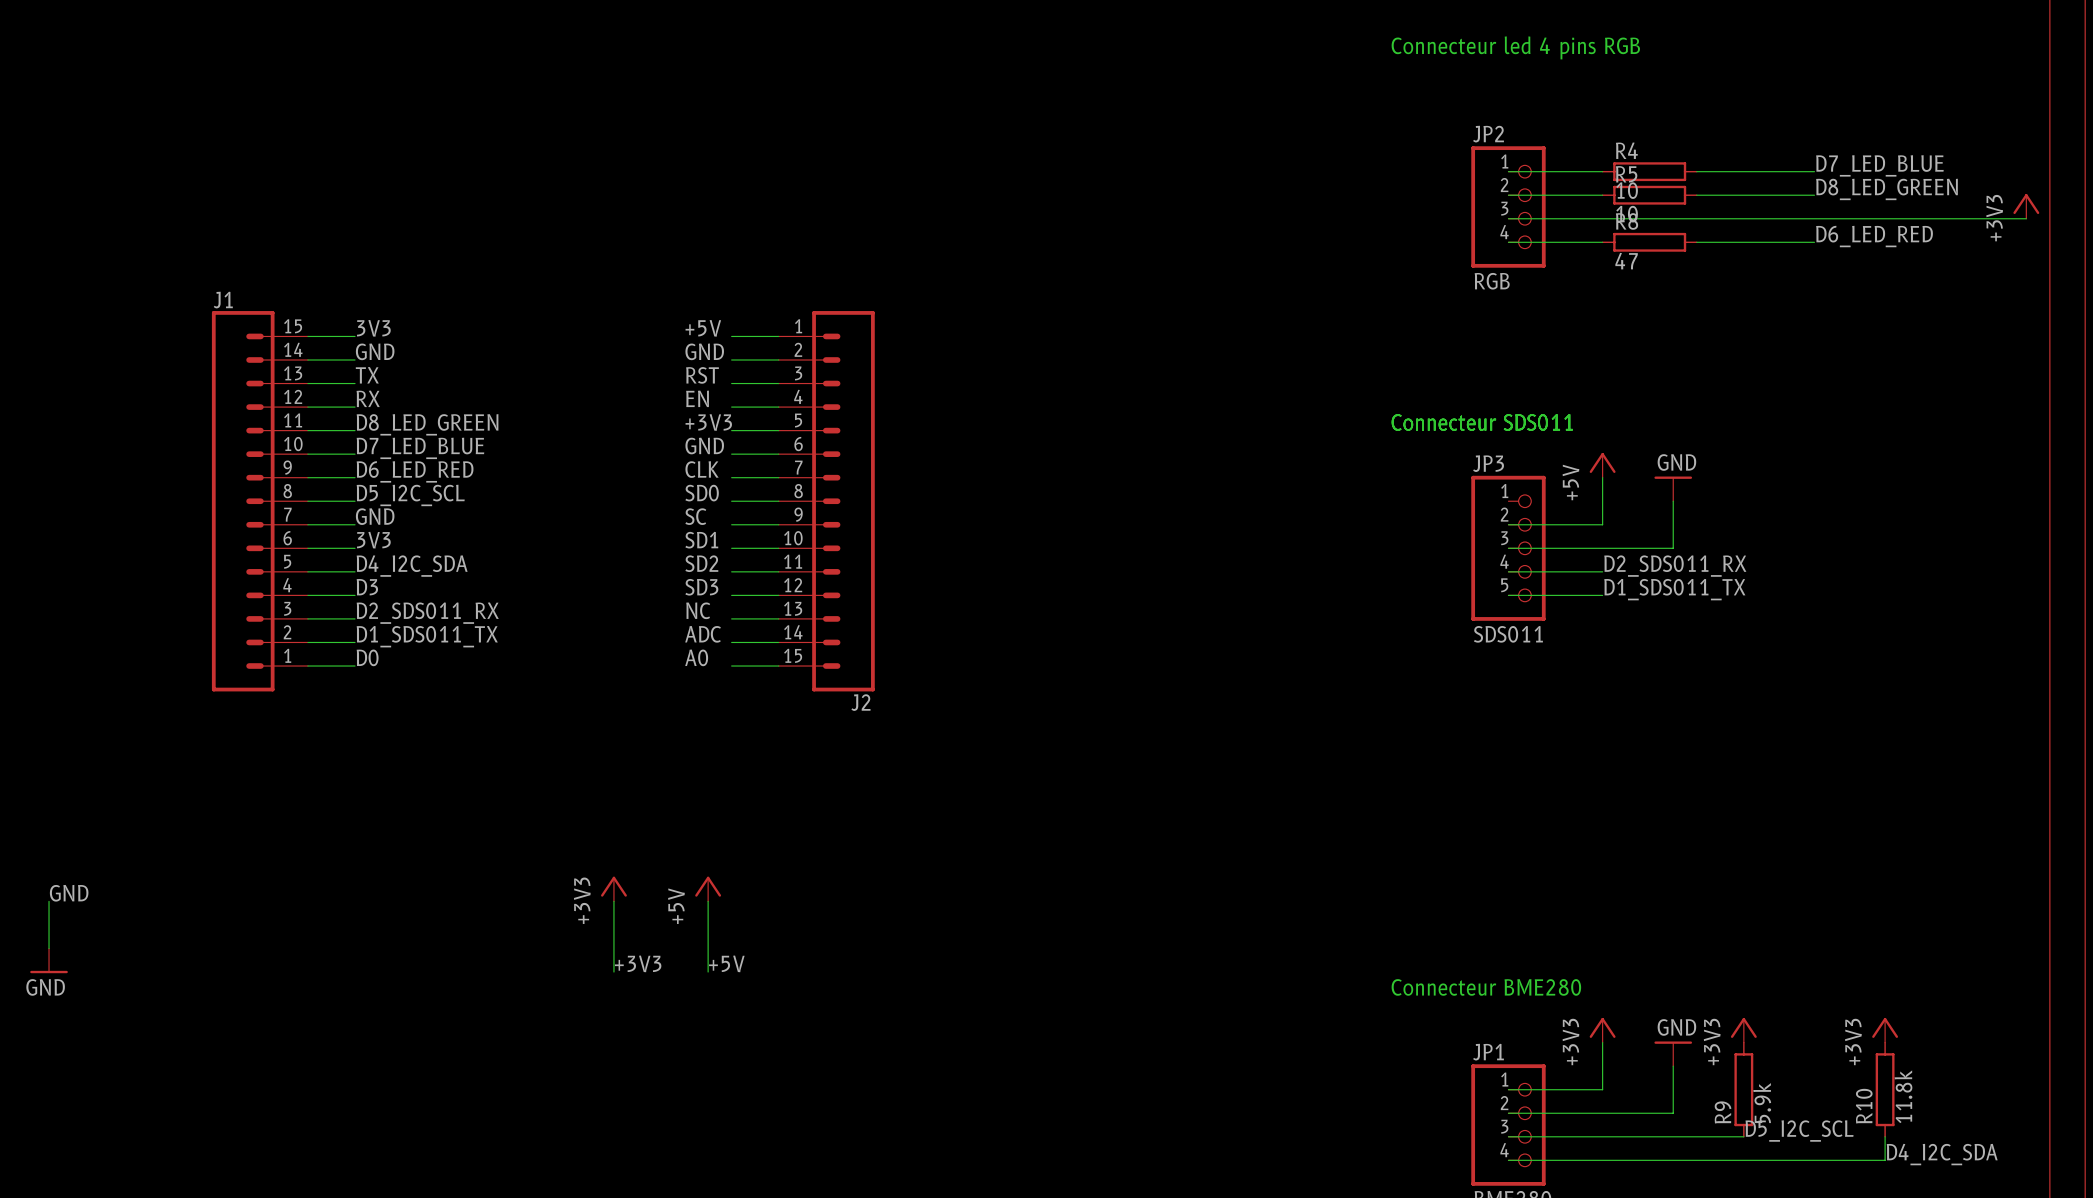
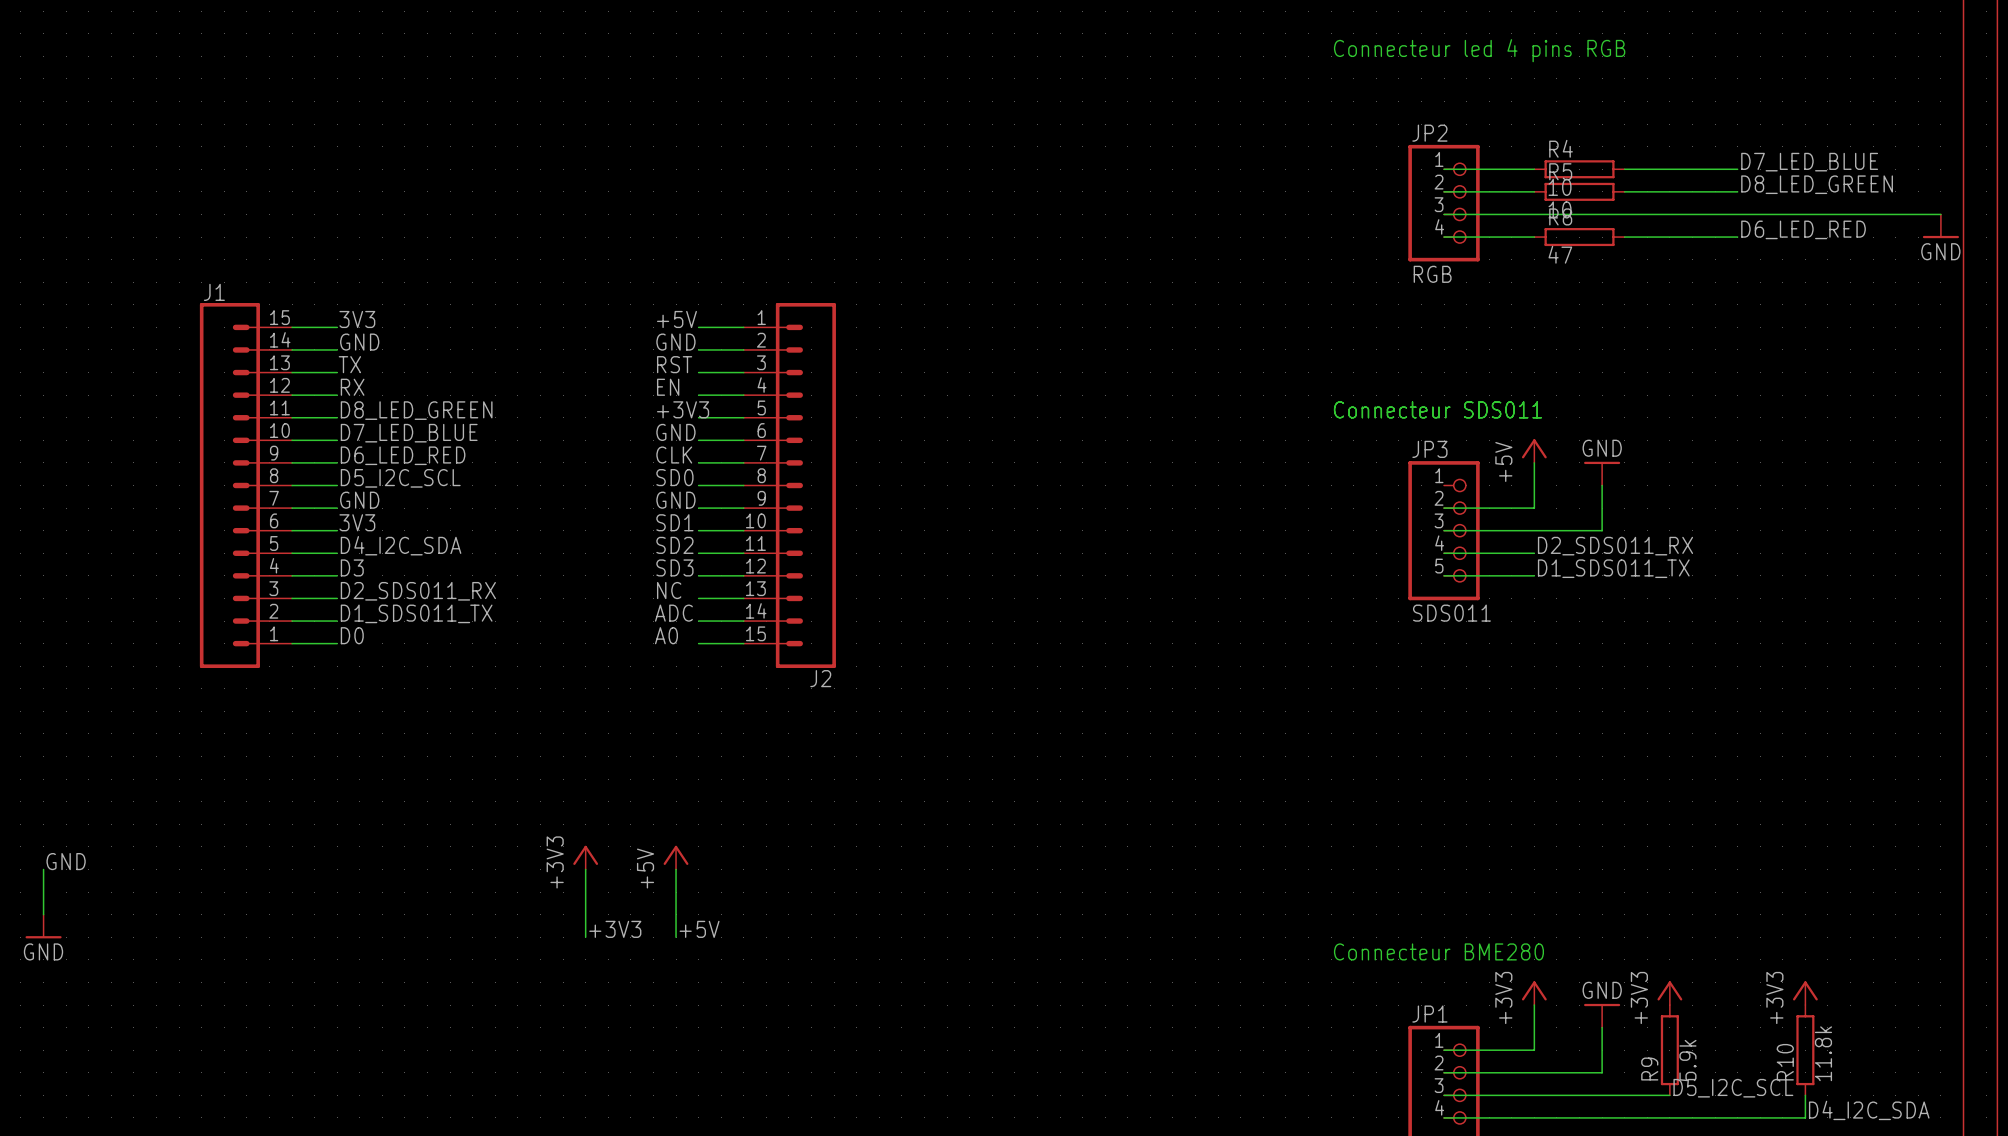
power symbol: +3V3 (2026, 206) -> none
power symbol: none -> GND (1940, 226)
label: SC (695, 516) -> GND (675, 500)

